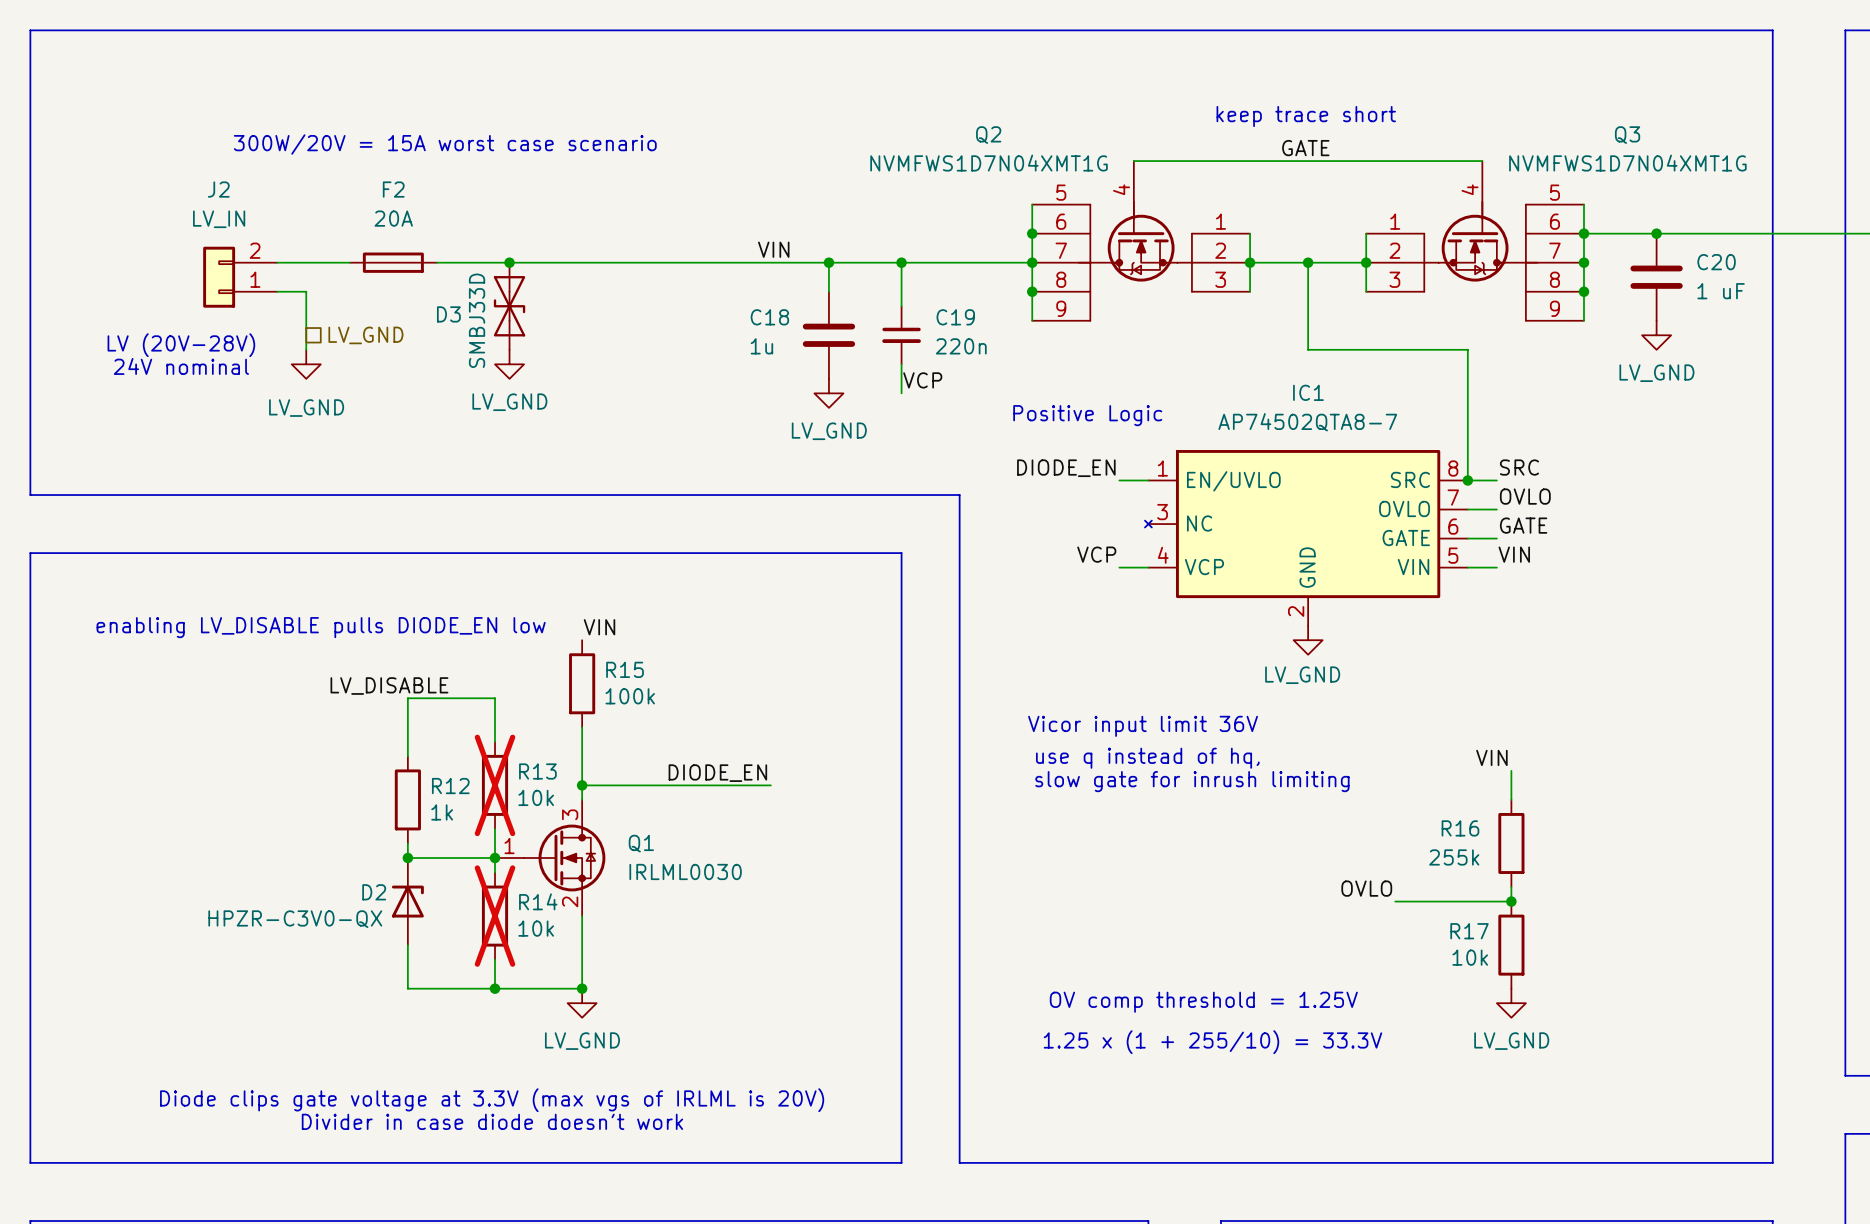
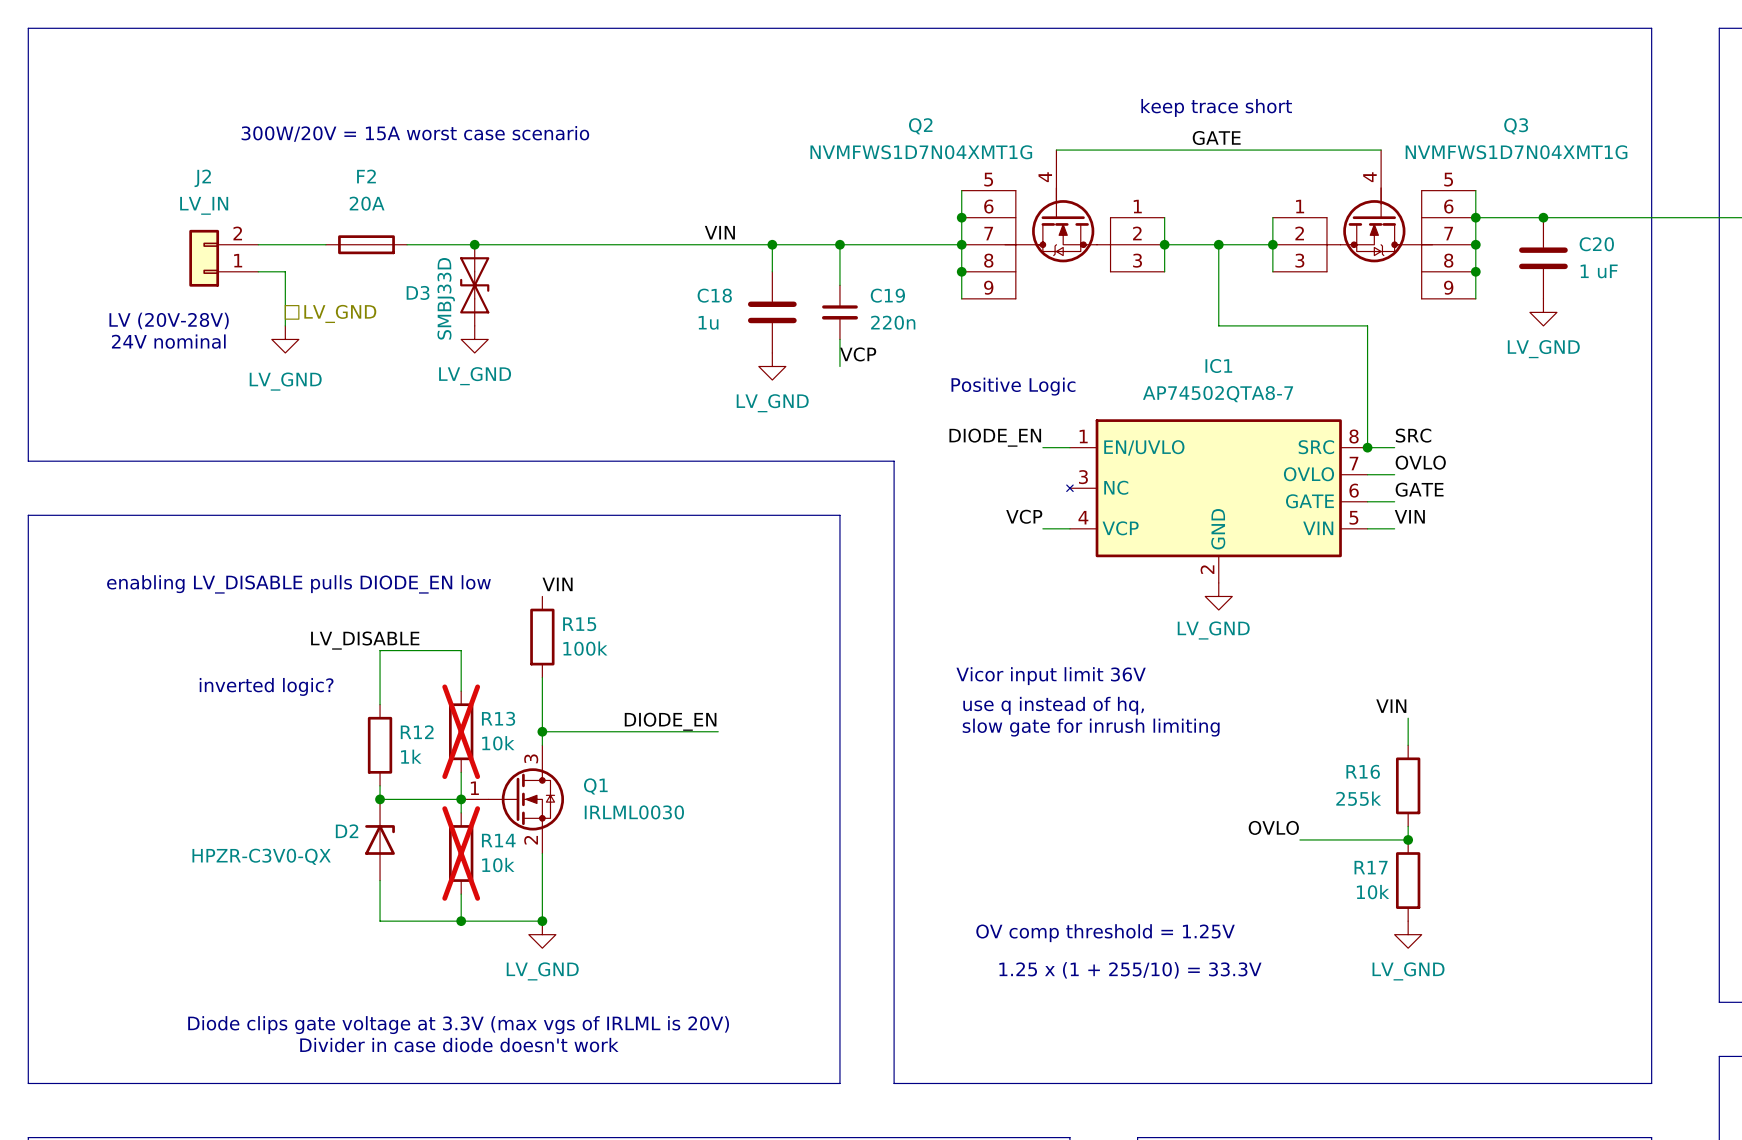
text: none -> inverted logic? (266, 686)

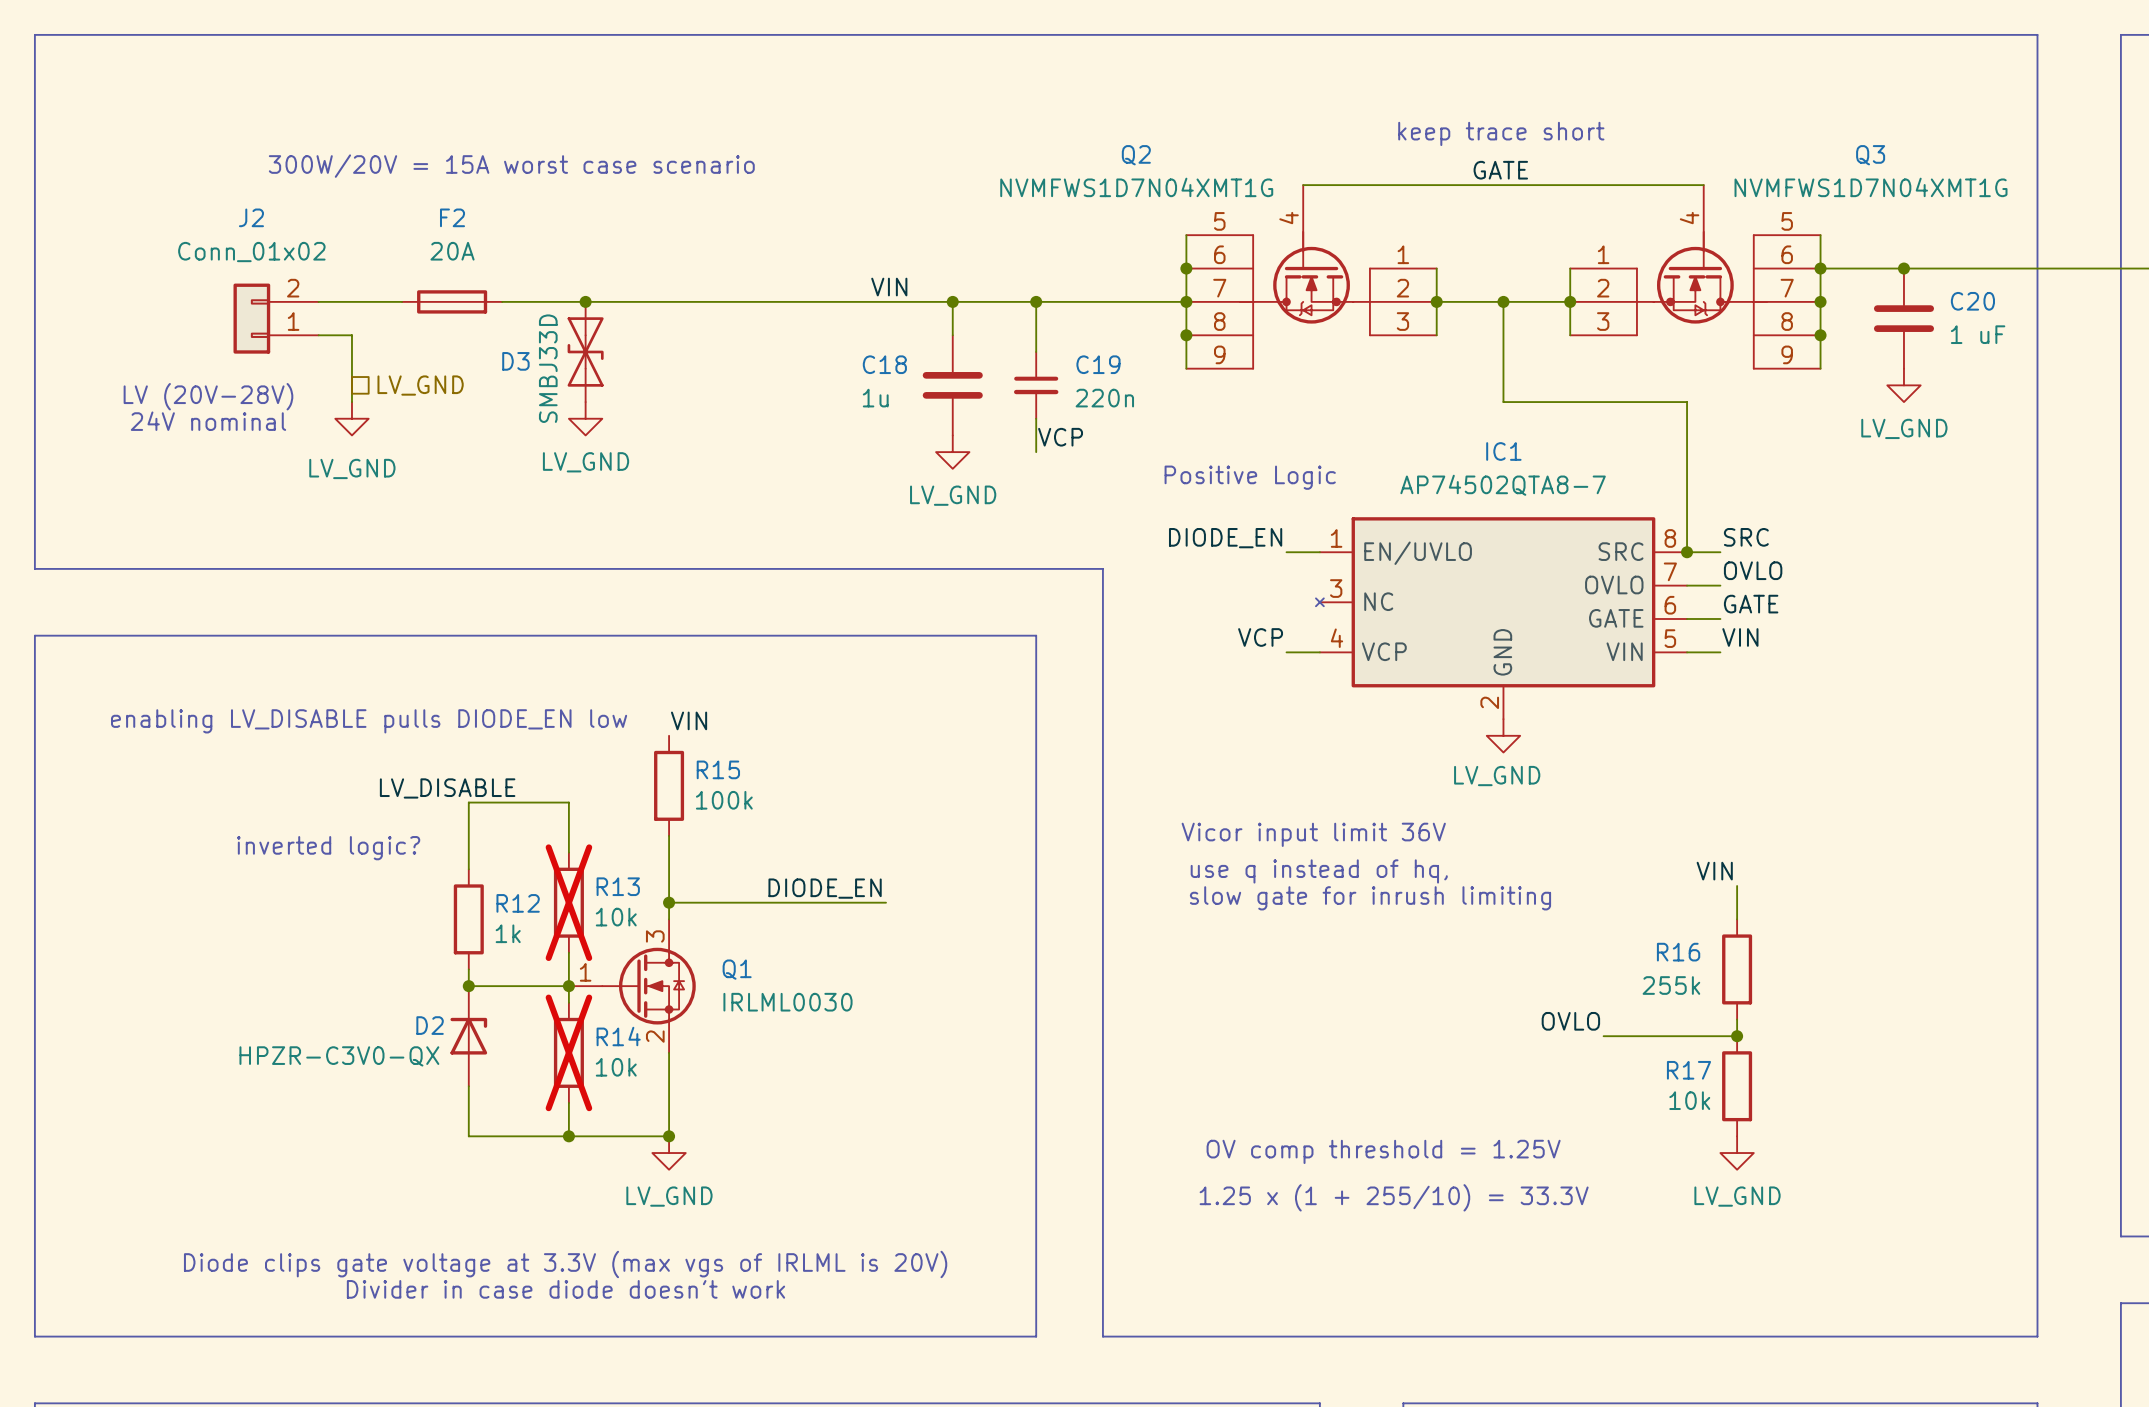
J2 value: LV_IN (204, 205) -> Conn_01x02 (251, 252)

